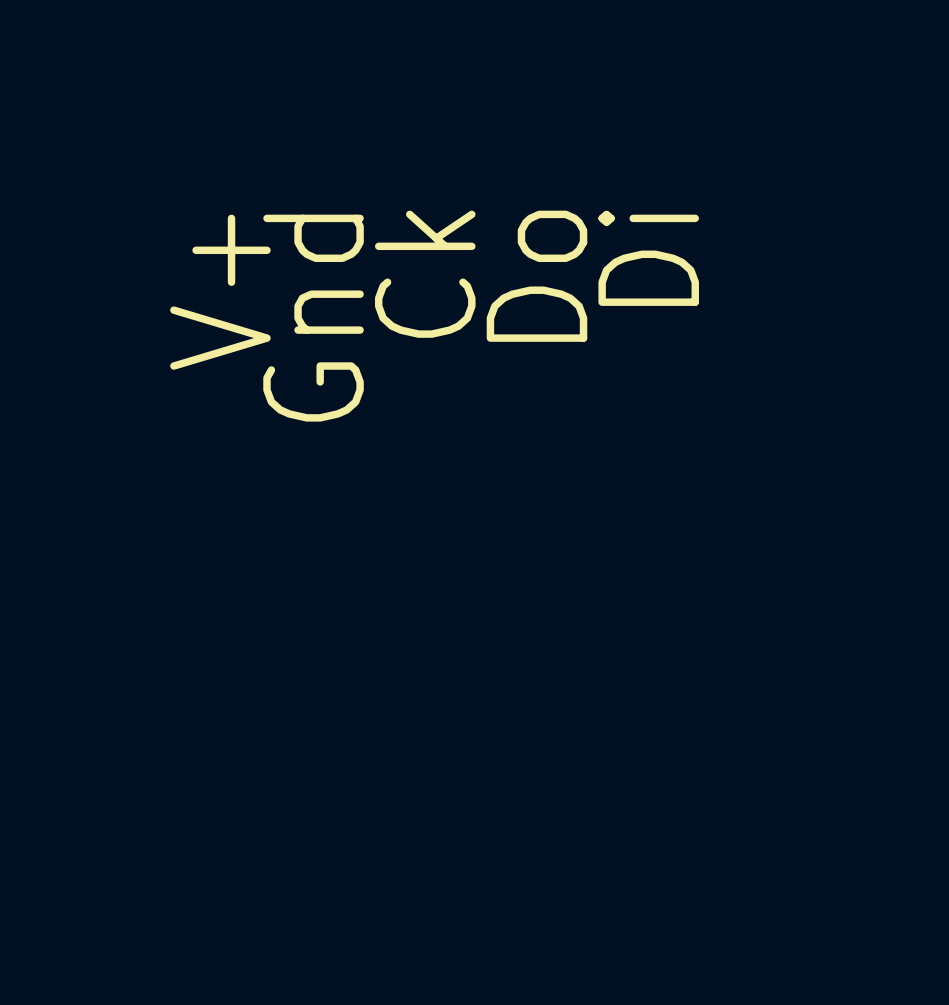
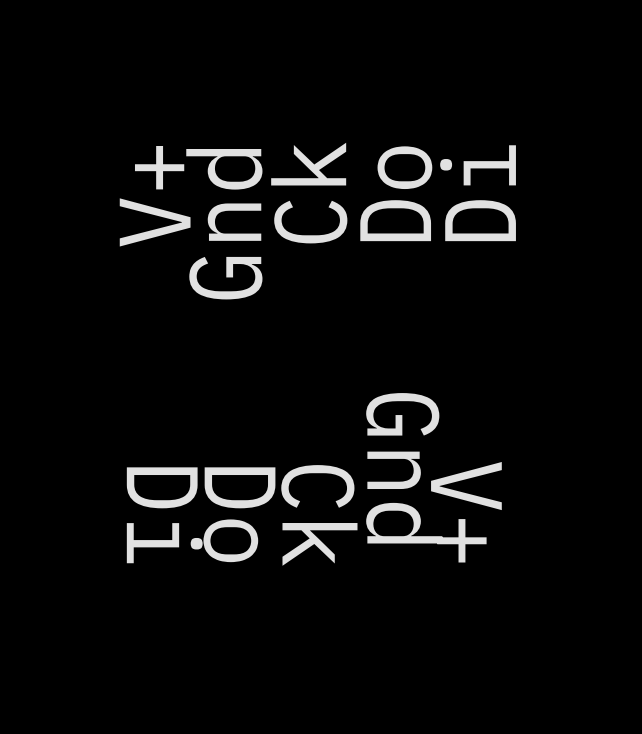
text: none -> Gnd (404, 468)
text: none -> Di (164, 515)
text: none -> Ck (319, 515)
text: none -> Do (239, 514)
text: none -> V+ (466, 512)

